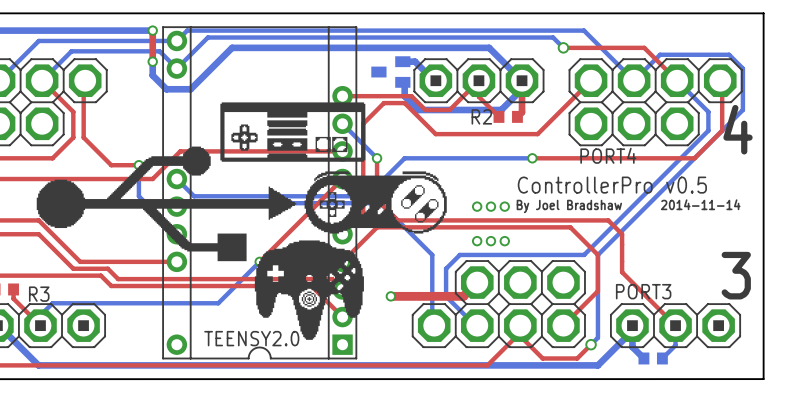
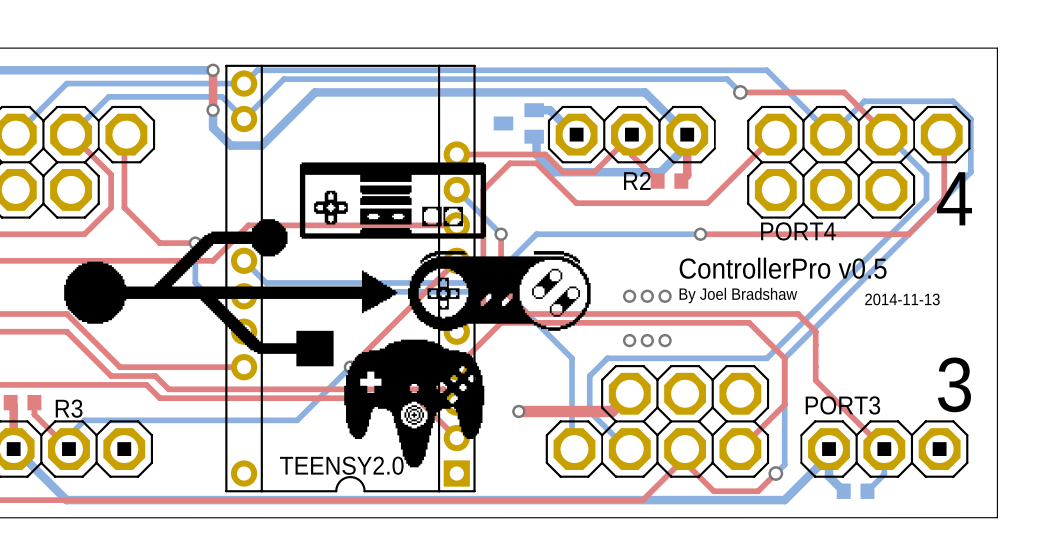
text: 2014-11-14 (700, 204) -> 2014-11-13 (902, 299)

